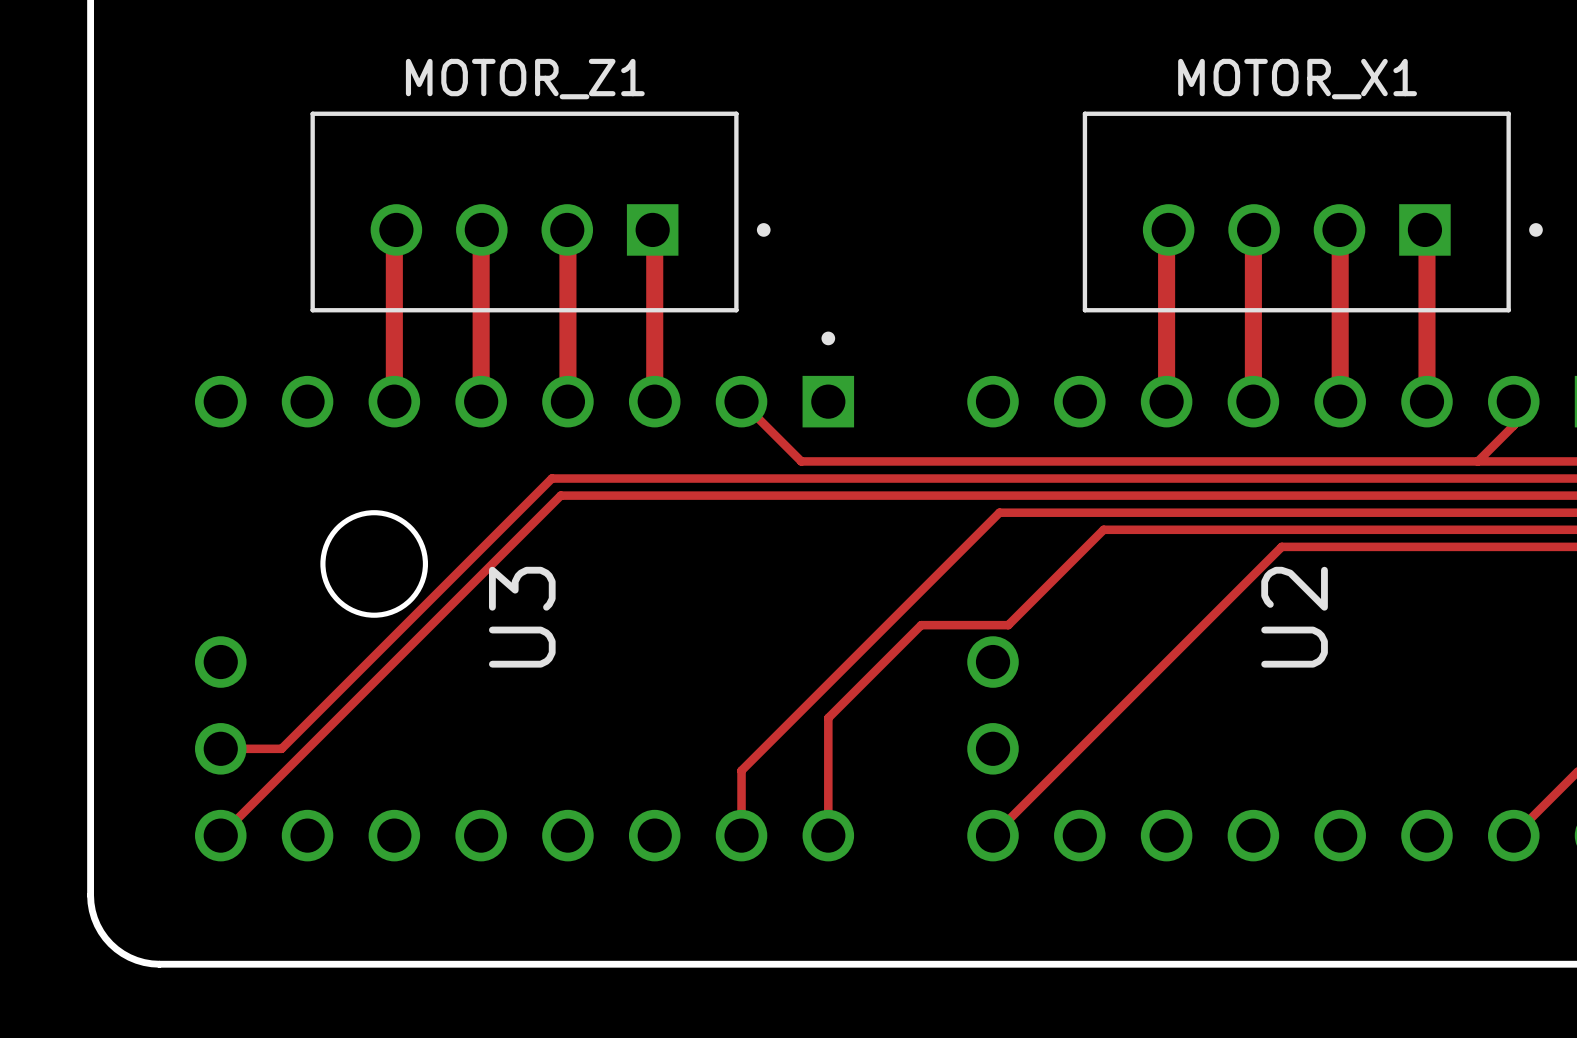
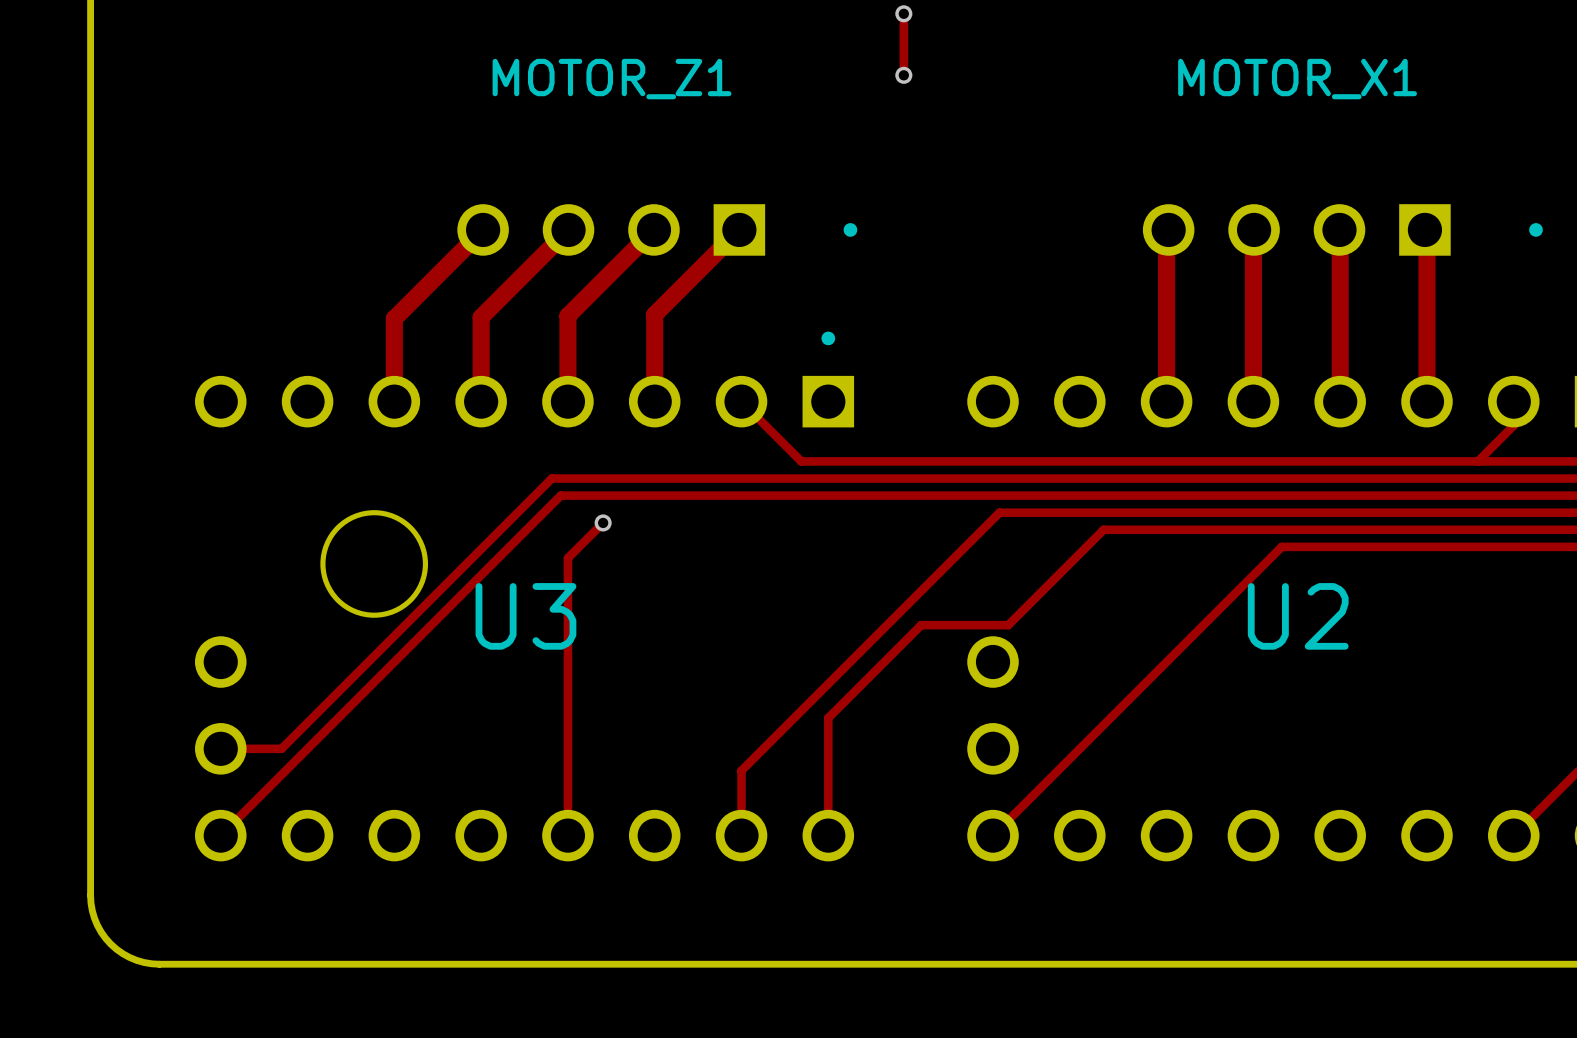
track: none -> (903, 13) (903, 75)
via: none -> (903, 13)
via: none -> (903, 75)
MOTOR_Z1 footprint: [310, 111, 771, 313] -> [457, 204, 858, 256]
MOTOR_X1 footprint: [1082, 111, 1543, 313] -> [1142, 204, 1543, 256]
track: (396, 229) (394, 231) (394, 318) -> (483, 229) (394, 318)
track: (481, 229) (481, 317) -> (568, 229) (481, 317)
track: (567, 229) (567, 315) -> (653, 229) (567, 315)
track: (652, 229) (654, 231) (654, 314) -> (739, 229) (654, 314)
track: none -> (603, 522) (567, 558) (567, 835)
via: none -> (603, 522)
U3 name rotation: 0° (522, 617) -> 90° clockwise (525, 616)
U2 name rotation: 0° (1294, 617) -> 90° clockwise (1298, 616)

